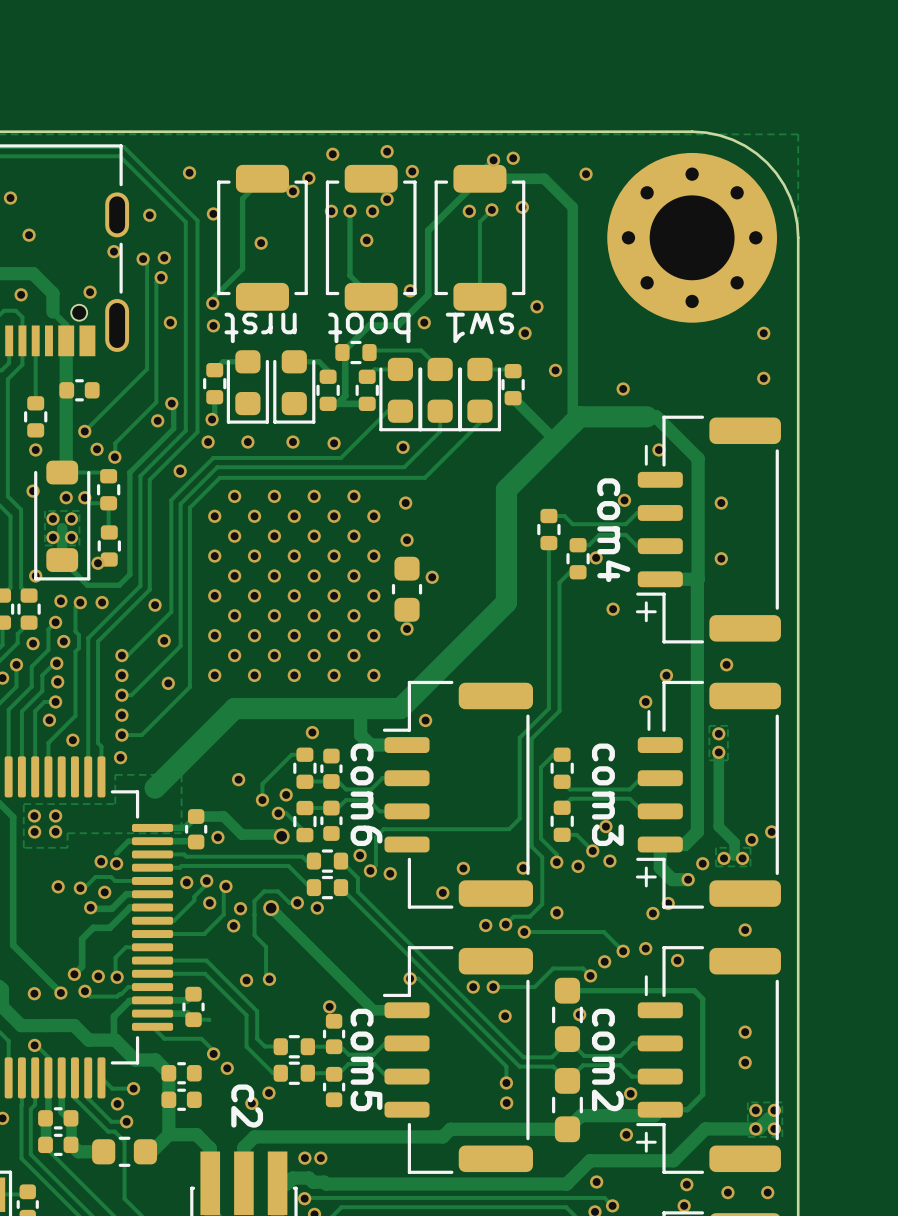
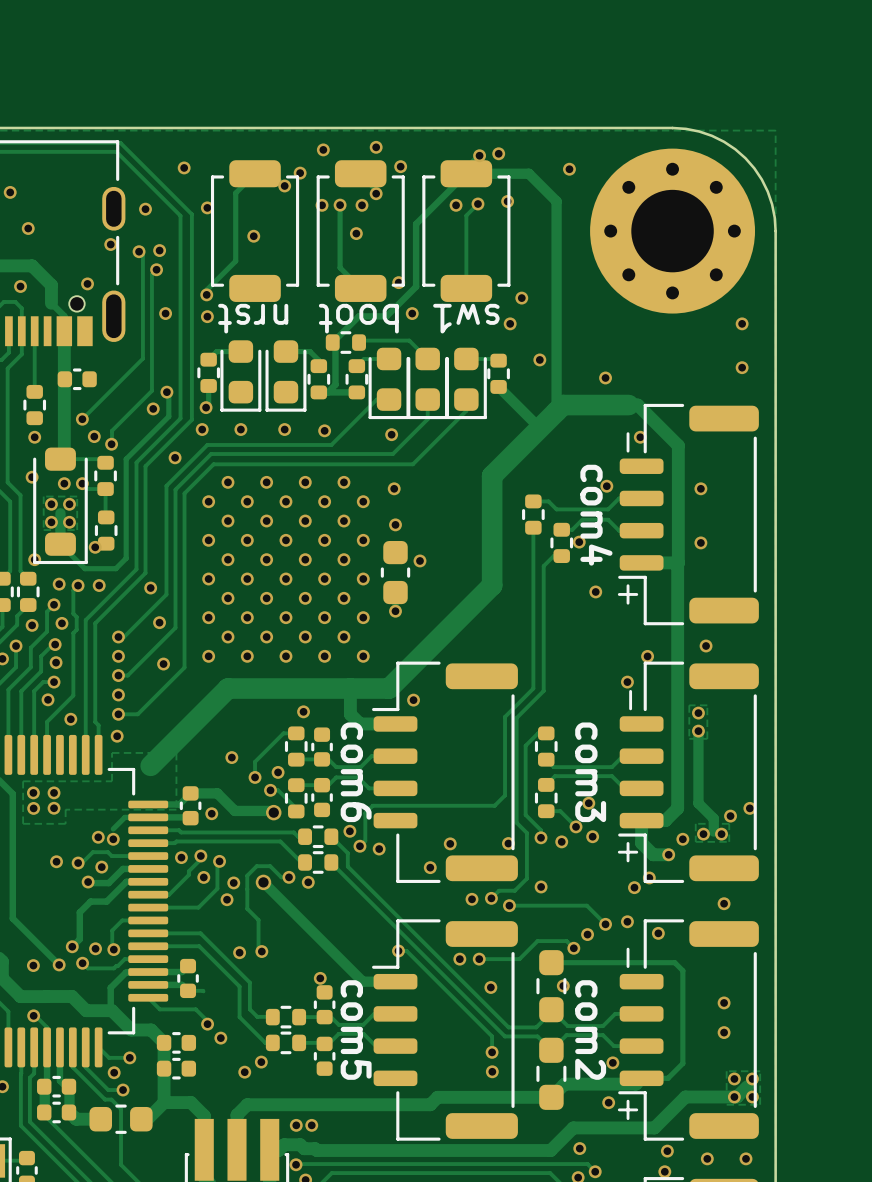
text: c2 (247, 1106) -> none

